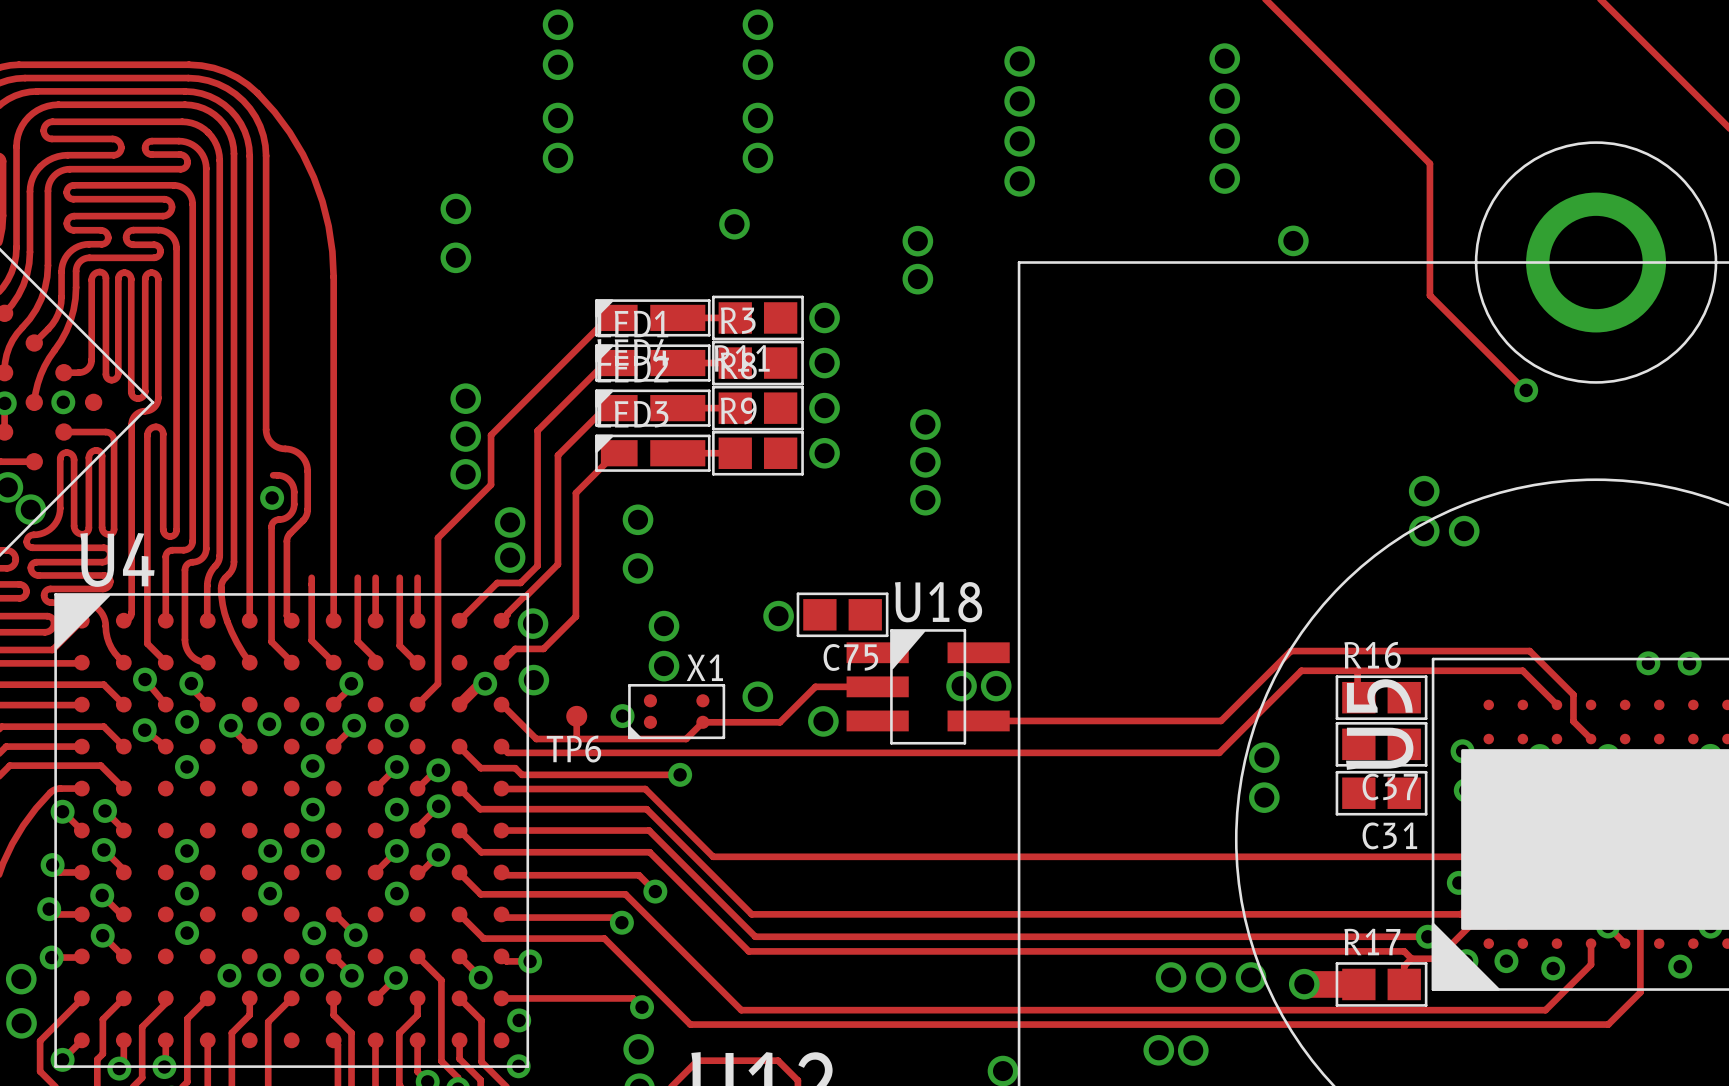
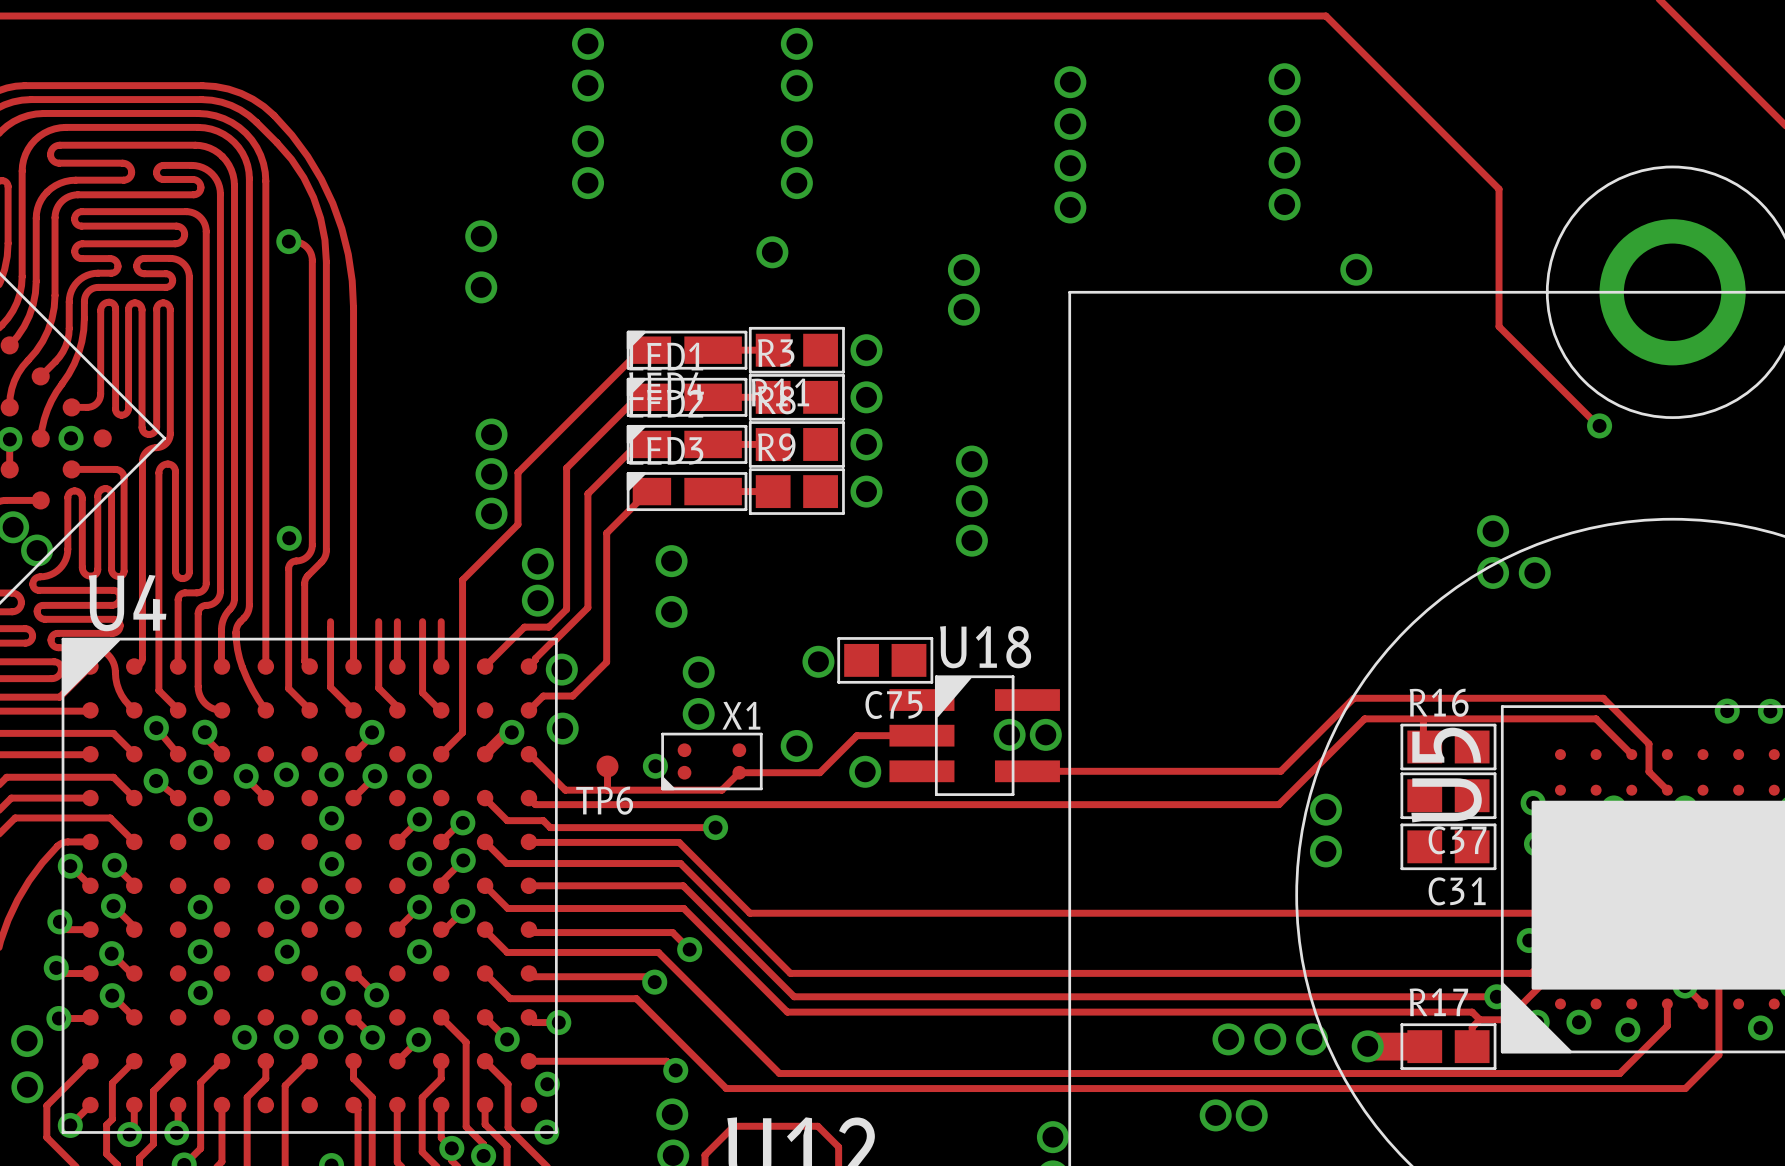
track: (188, 78) (218, 83) (235, 94) (250, 108) (263, 135) (266, 155) (266, 432) (270, 441) (275, 446) (293, 450) (301, 455) (305, 462) (307, 471) -> (201, 99) (231, 105) (256, 122) (291, 159) (303, 177) (320, 218) (326, 261) (326, 510)
via: none -> (288, 241)
track: (273, 475) (287, 478) (291, 483) (294, 492) -> (288, 241) (298, 242) (304, 245) (312, 258) (312, 532)

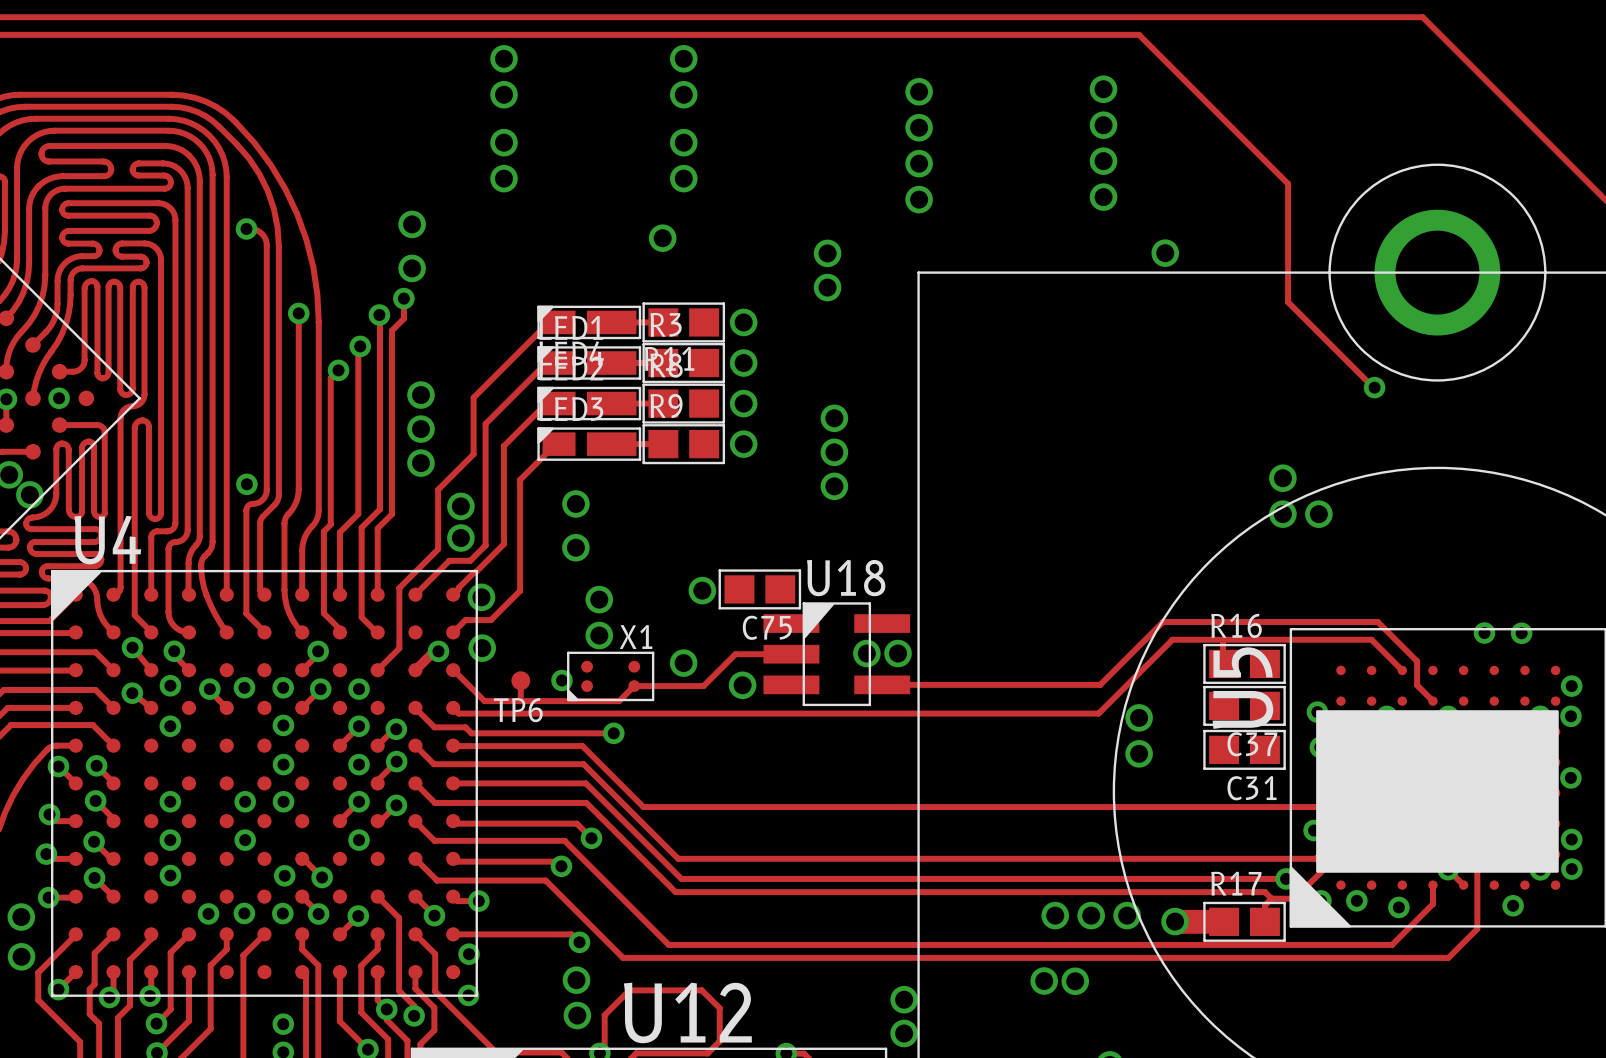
track: (273, 115) (291, 135) (321, 179) (341, 228) (348, 254) (353, 307) (353, 615) -> (318, 321) (318, 513) (315, 521) (304, 537) (302, 550)
track: none -> (233, 120) (254, 143) (271, 165) (297, 214) (313, 267) (318, 322)
track: none -> (403, 298) (403, 318) (391, 330) (391, 514) (377, 528) (377, 556)
via: none -> (403, 298)
via: none -> (298, 313)
via: none -> (379, 315)
track: none -> (380, 315) (380, 509) (361, 527) (361, 556)
track: (640, 350) (517, 472) (517, 524) (462, 580) (462, 732) -> (548, 322) (473, 397) (473, 454) (438, 489) (438, 549) (399, 588) (399, 648) (396, 651)
track: none -> (360, 346) (358, 348) (358, 514) (339, 532) (339, 556)
via: none -> (360, 346)
track: none -> (338, 370) (330, 378) (330, 524) (323, 531) (323, 556)
via: none -> (338, 370)
track: (330, 621) (330, 687) (353, 710) -> (298, 313) (298, 488) (296, 502) (284, 521) (284, 589) (289, 612) (302, 632)

